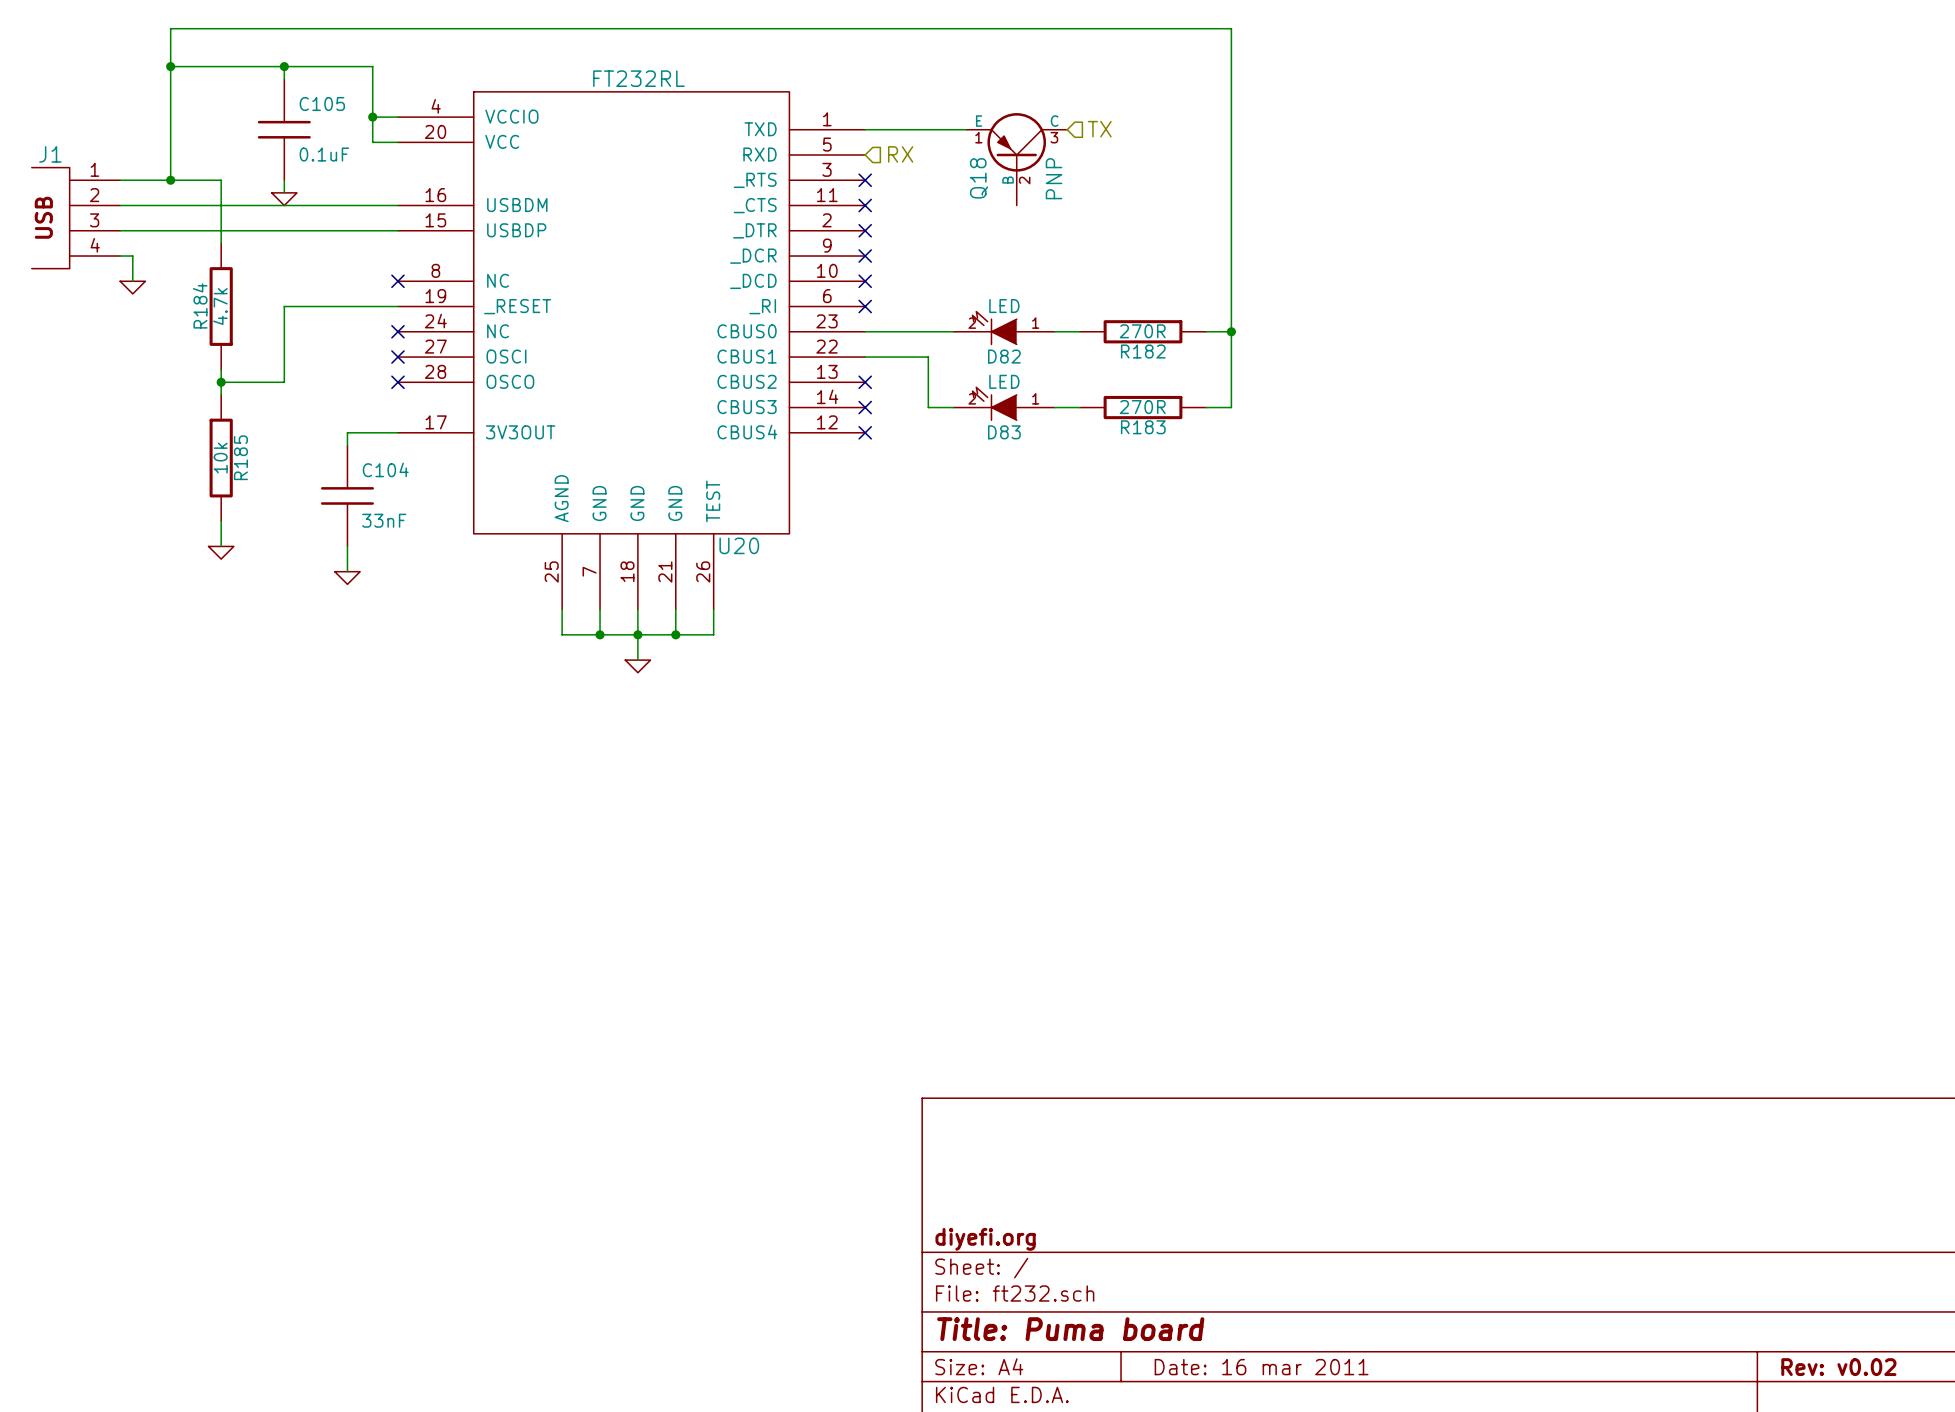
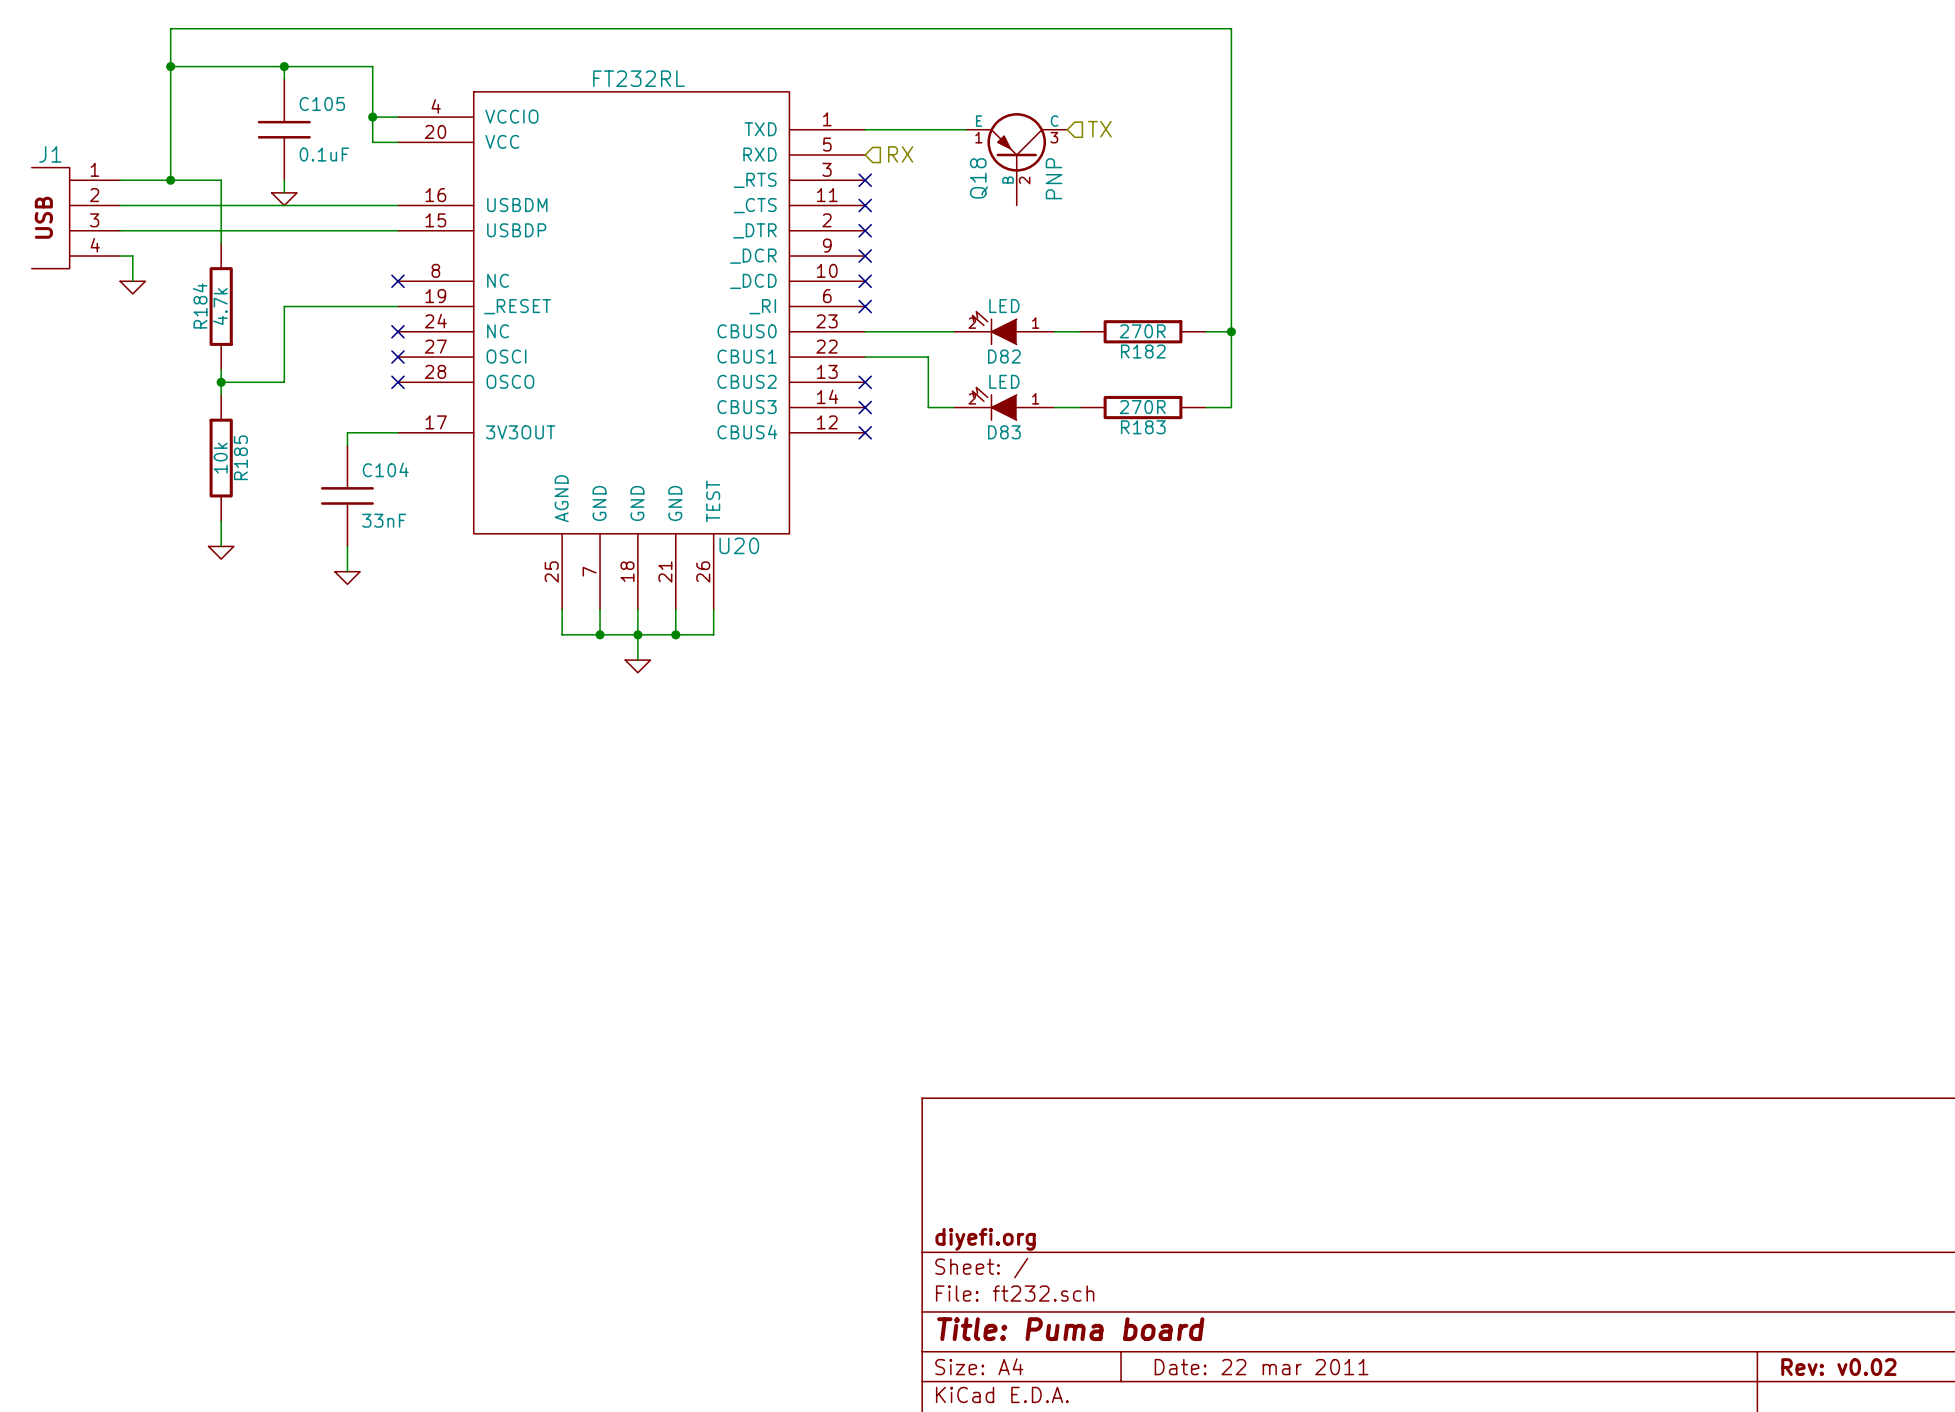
title block: Date: 16 mar 2011 (1261, 1367) -> Date: 22 mar 2011 (1261, 1367)

